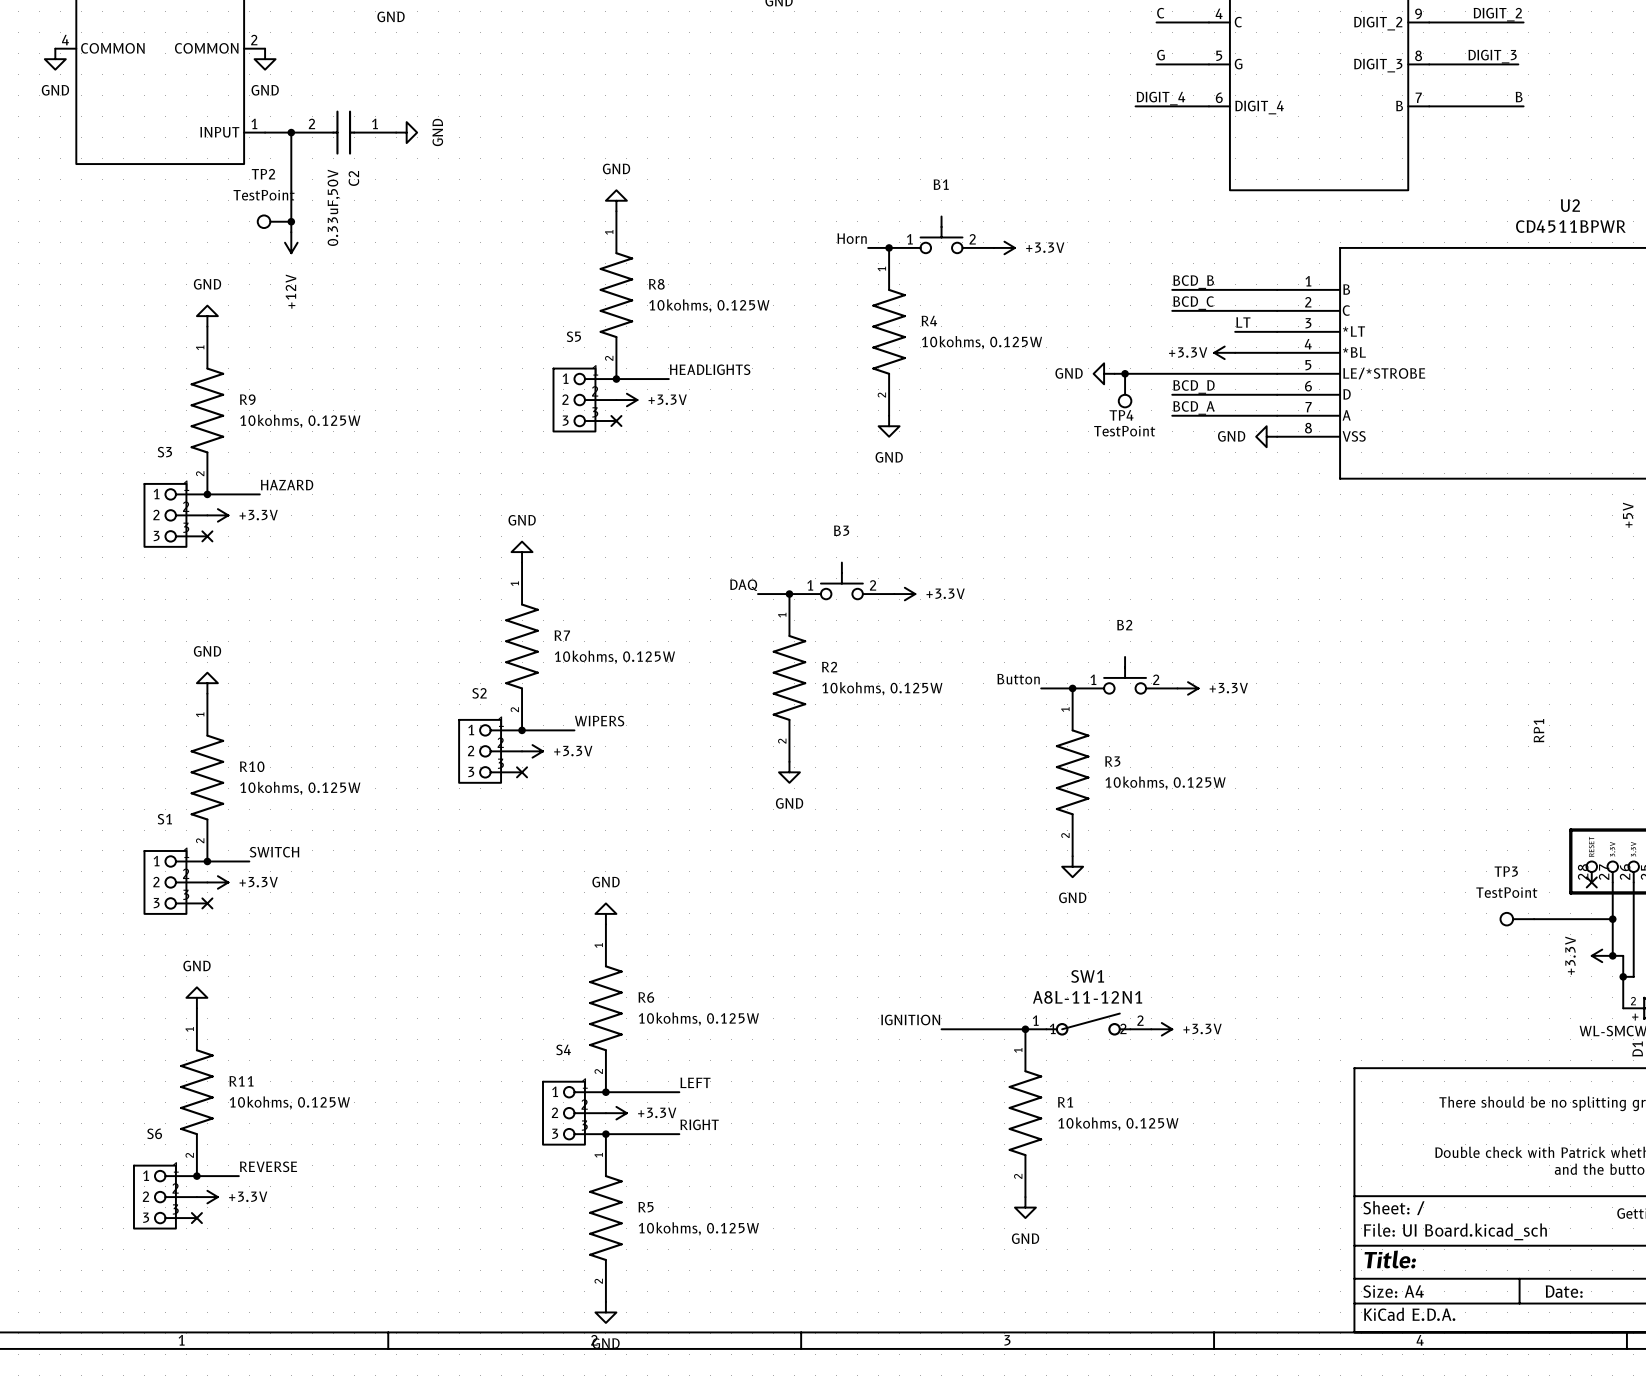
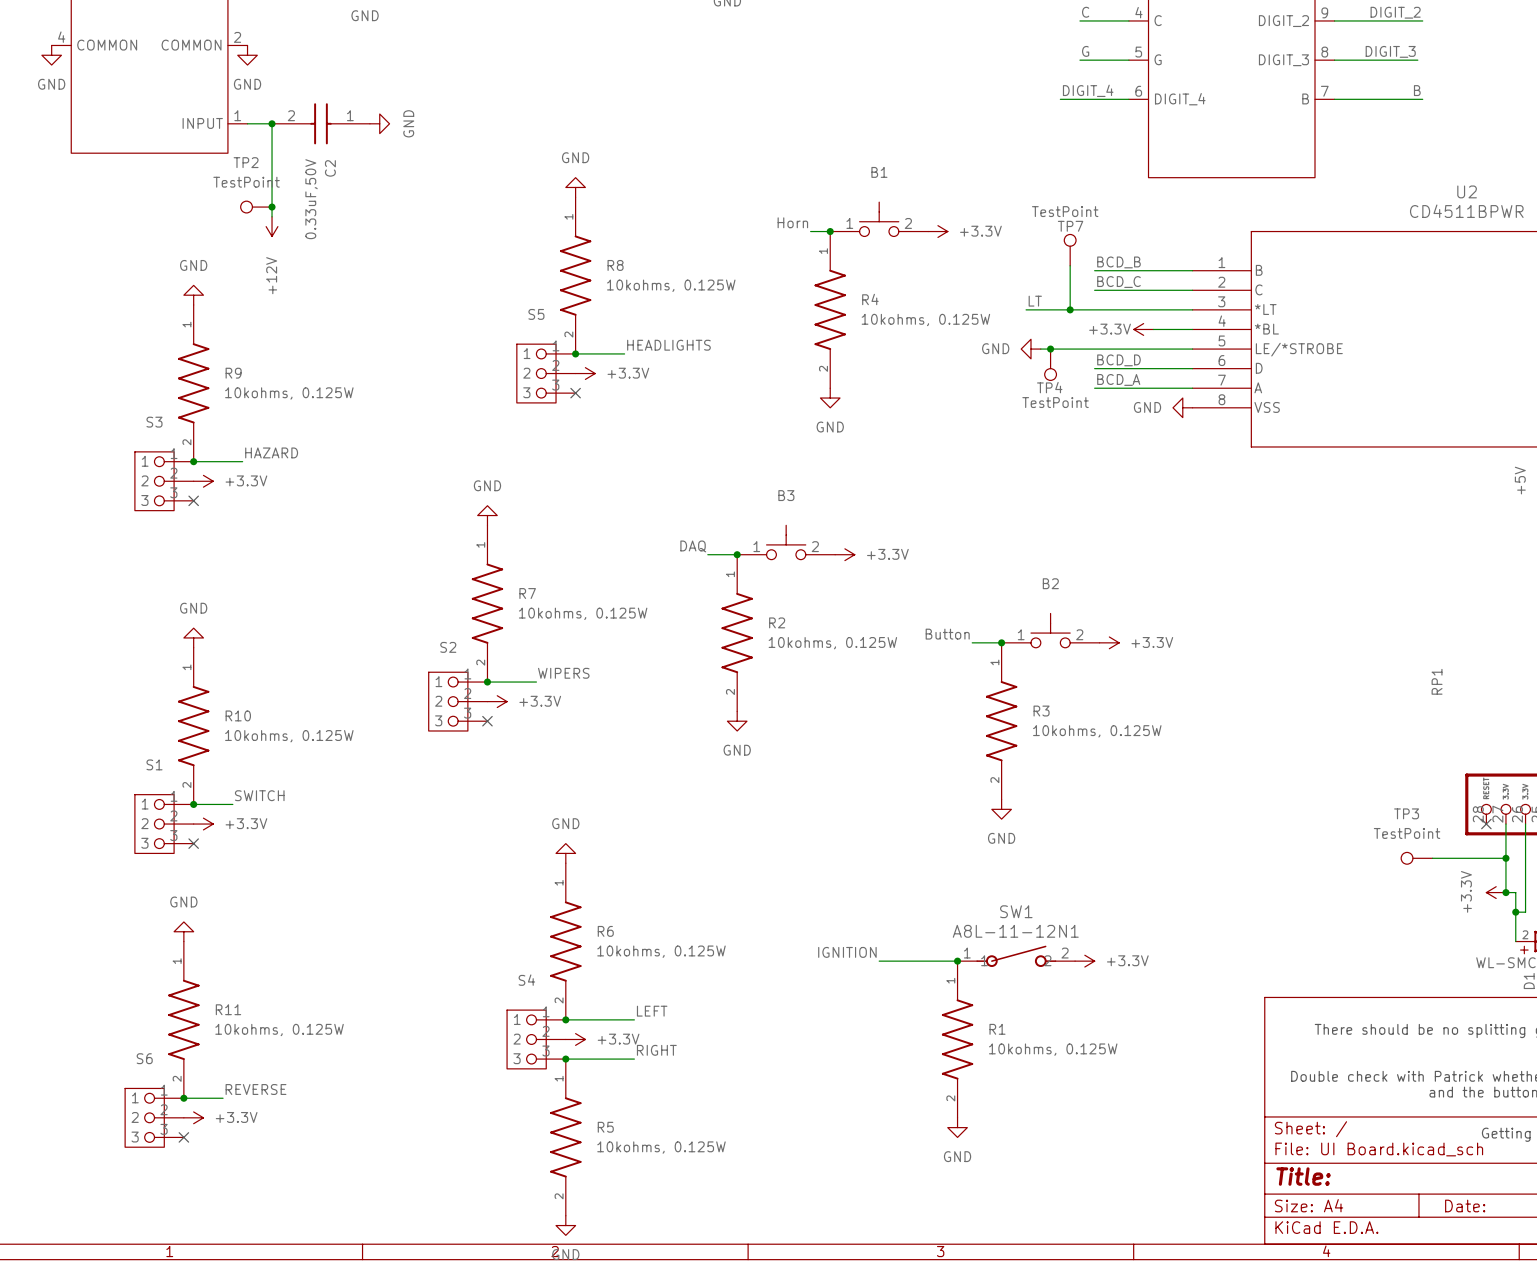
TP7: none -> TestPoint (1070, 250)
wire: none -> (1070, 265) (1070, 309)
label position: LT (1243, 322) -> LT (1035, 301)
wire: none -> (1026, 309) (1153, 309)
junction: none -> (1070, 309)

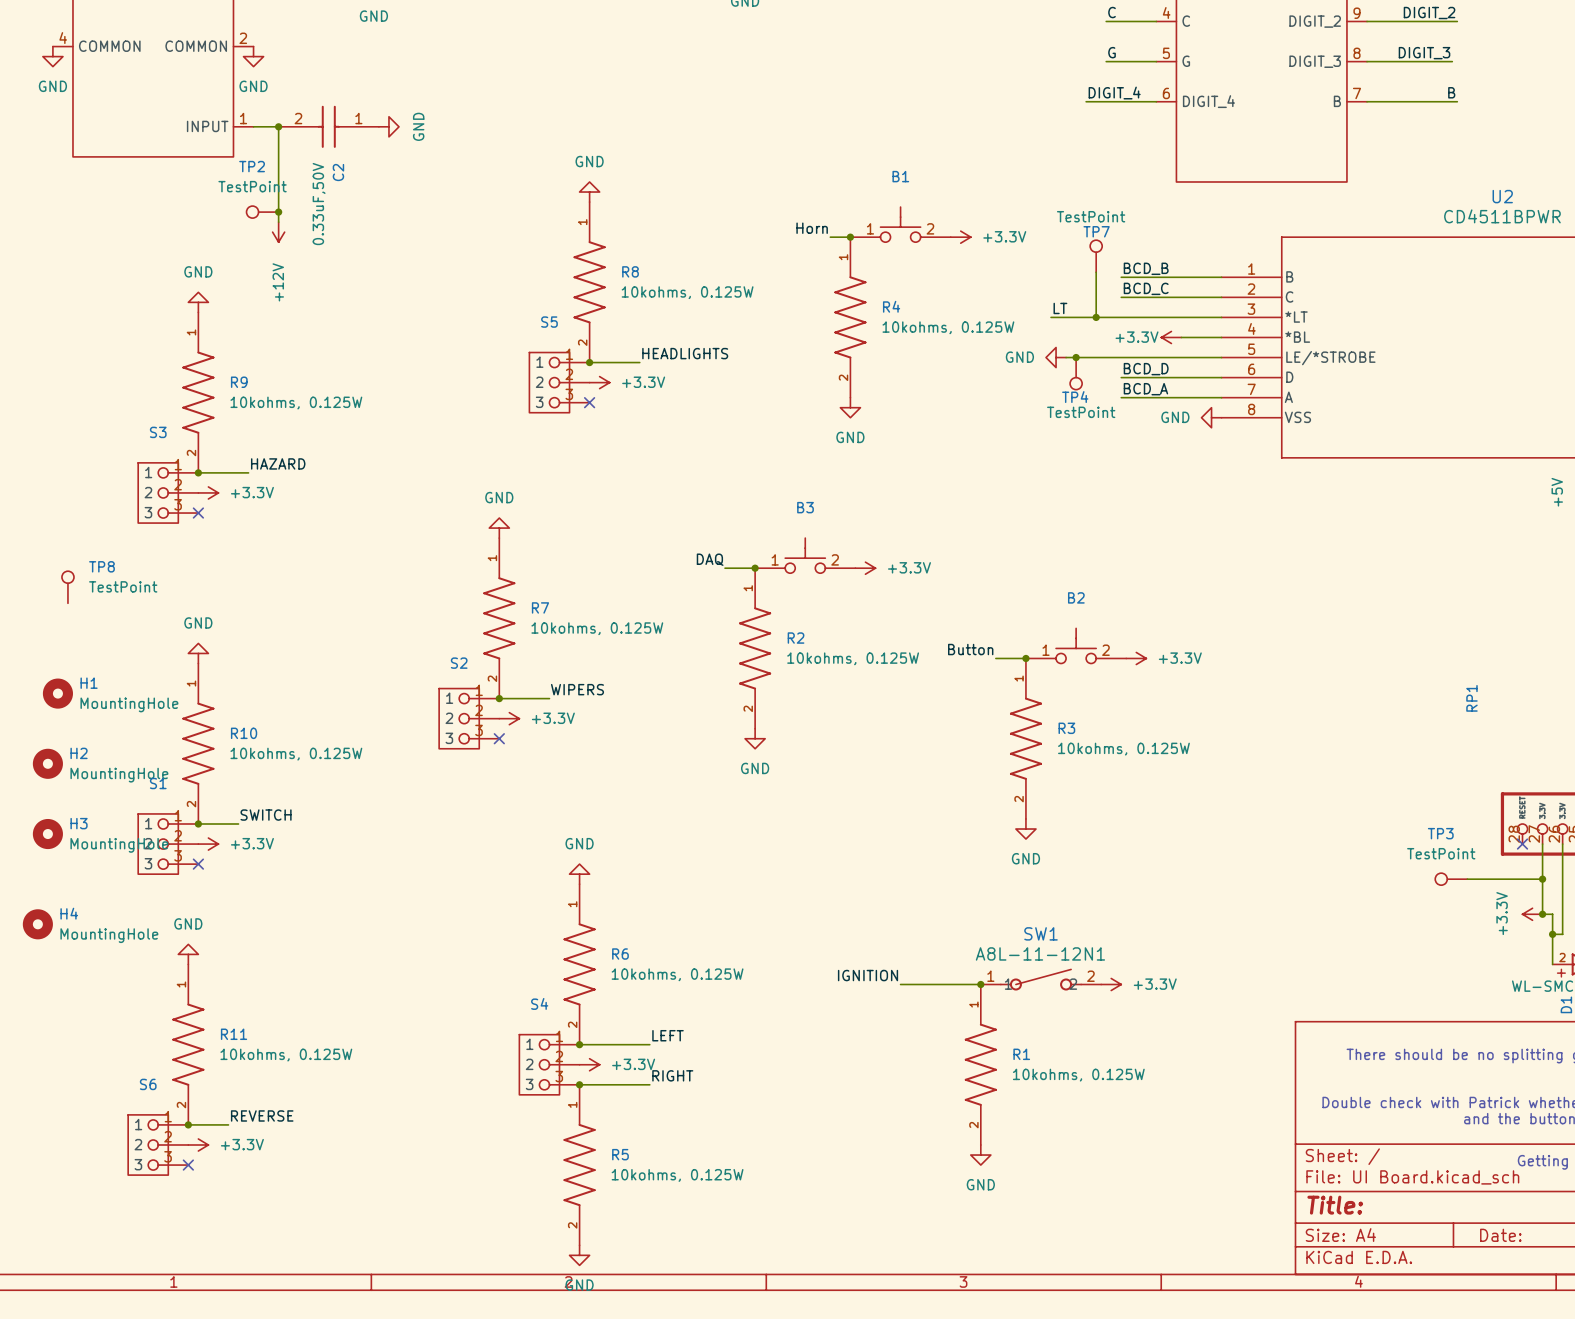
TP8: none -> TestPoint (67, 587)
H1: none -> MountingHole (57, 693)
H2: none -> MountingHole (47, 763)
H3: none -> MountingHole (47, 834)
H4: none -> MountingHole (37, 924)

